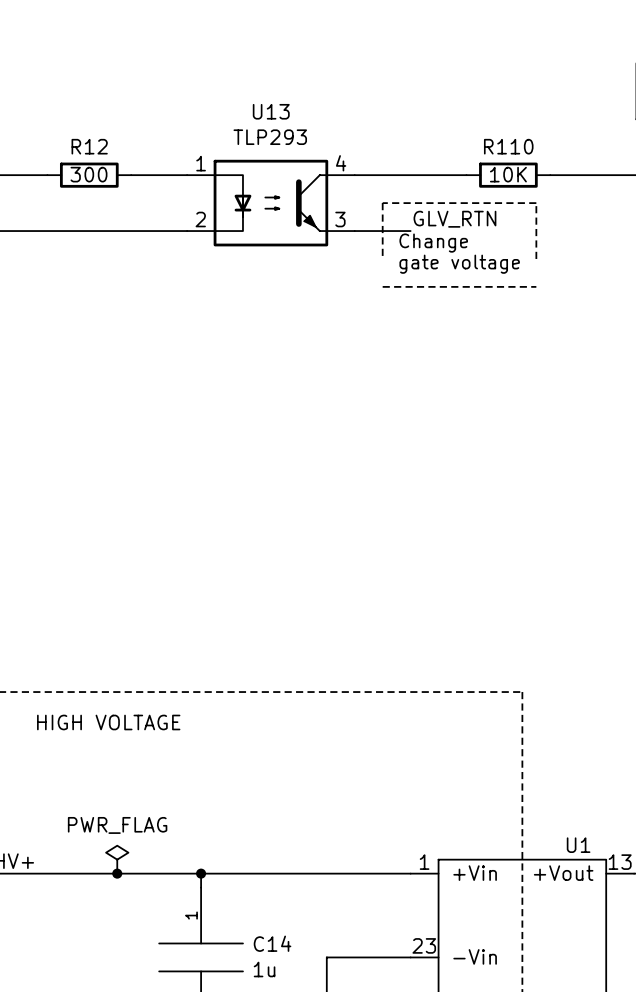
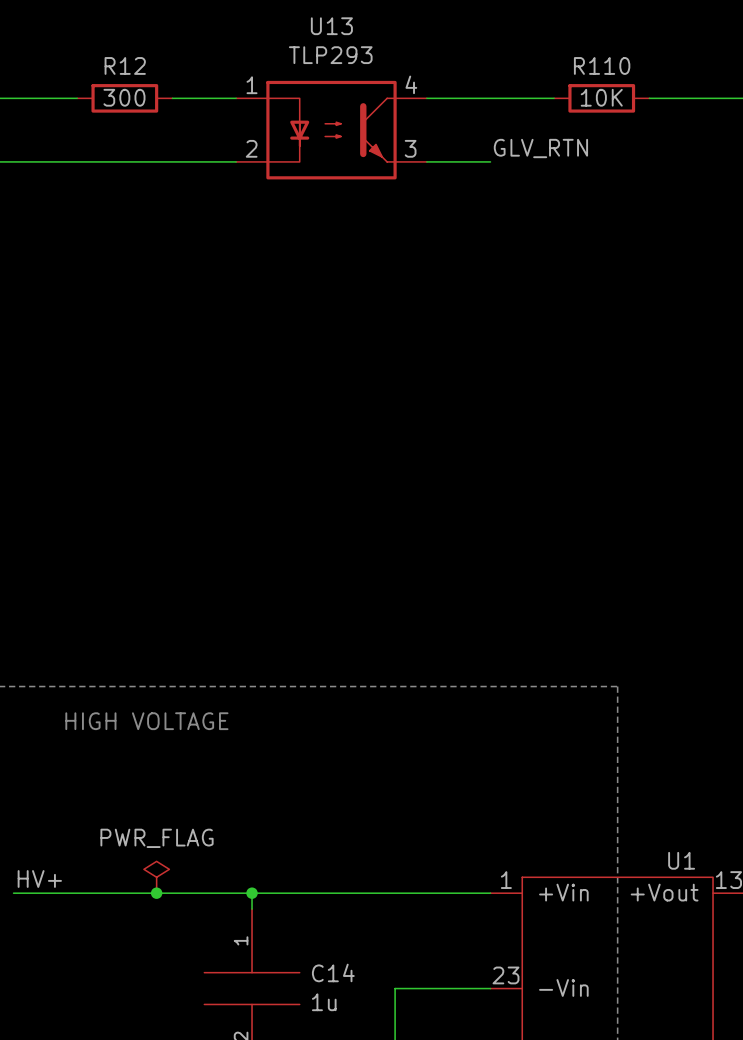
text: Change (433, 243) -> none
line: (382, 258) (382, 203) (536, 203) (536, 258) -> none
text: gate voltage (459, 264) -> none
line: (382, 286) (536, 286) -> none

